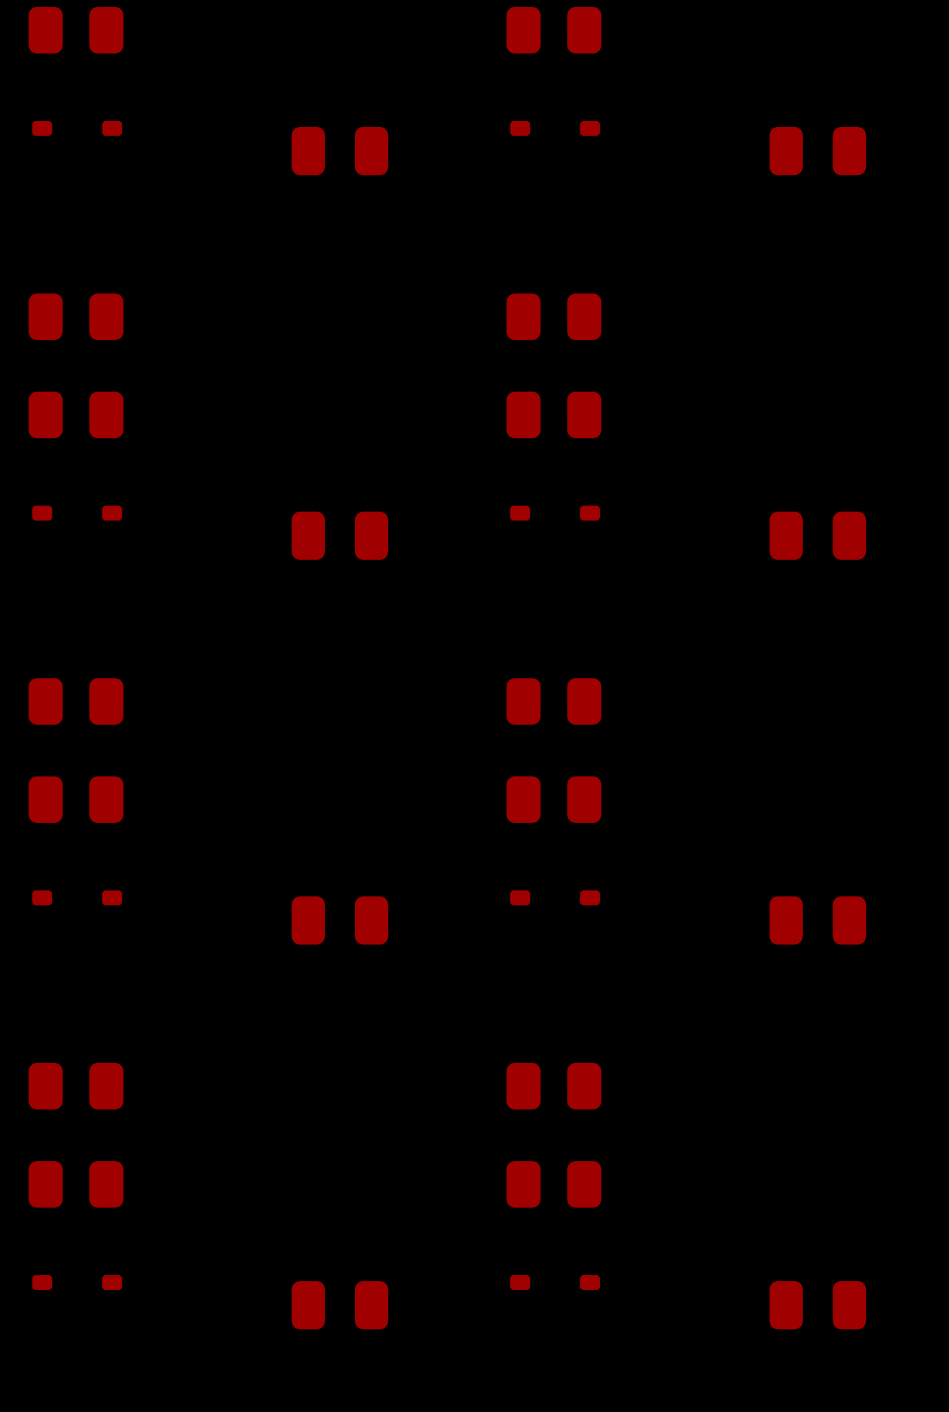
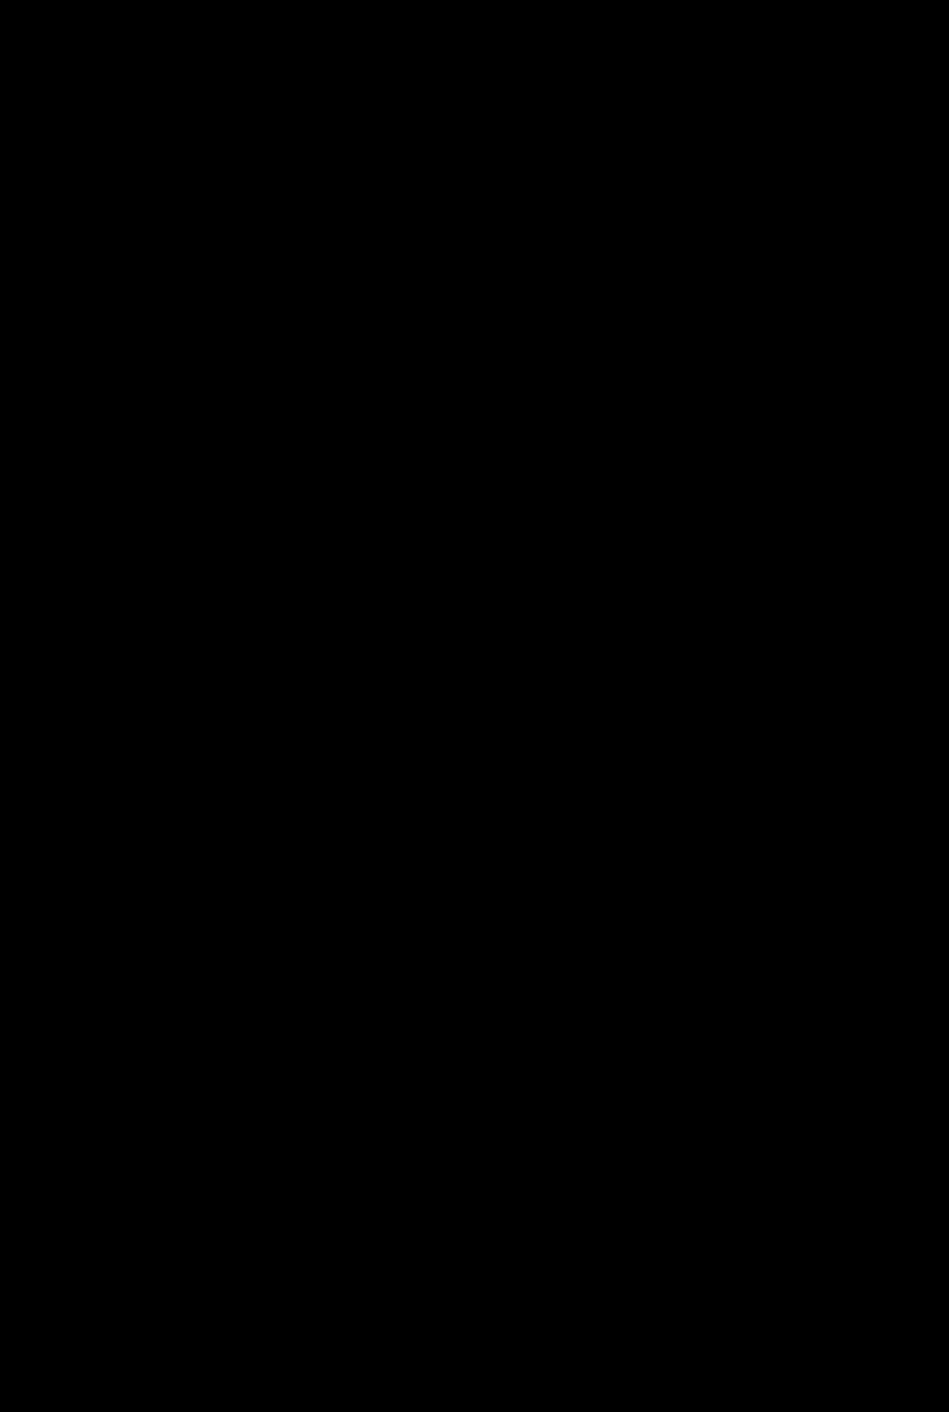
part: (76, 30) -> none
part: (553, 30) -> none
part: (77, 128) -> none
part: (555, 128) -> none
part: (339, 151) -> none
part: (817, 151) -> none
part: (76, 316) -> none
part: (553, 316) -> none
part: (76, 414) -> none
part: (553, 414) -> none
part: (77, 513) -> none
part: (555, 513) -> none
part: (339, 535) -> none
part: (817, 535) -> none
part: (76, 701) -> none
part: (553, 701) -> none
part: (76, 799) -> none
part: (553, 799) -> none
part: (77, 897) -> none
part: (555, 897) -> none
part: (339, 920) -> none
part: (817, 920) -> none
part: (76, 1086) -> none
part: (553, 1086) -> none
part: (76, 1184) -> none
part: (553, 1184) -> none
part: (77, 1282) -> none
part: (555, 1282) -> none
part: (339, 1305) -> none
part: (817, 1305) -> none

